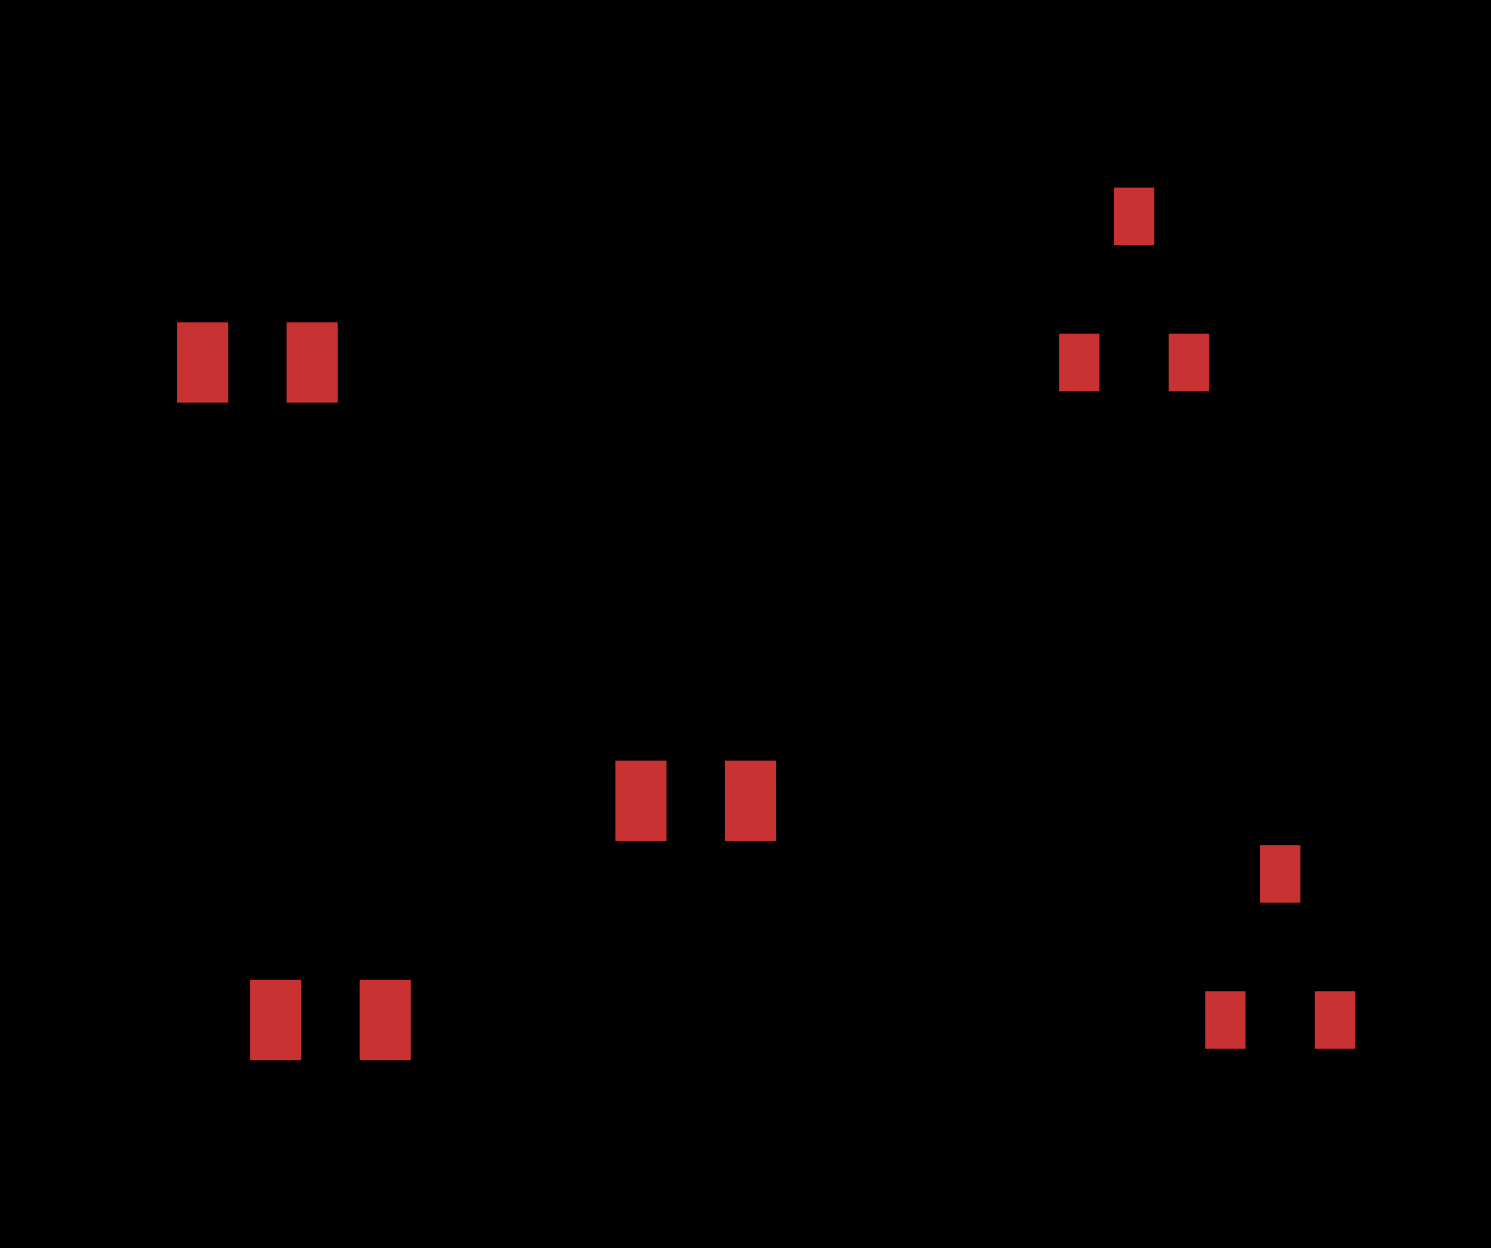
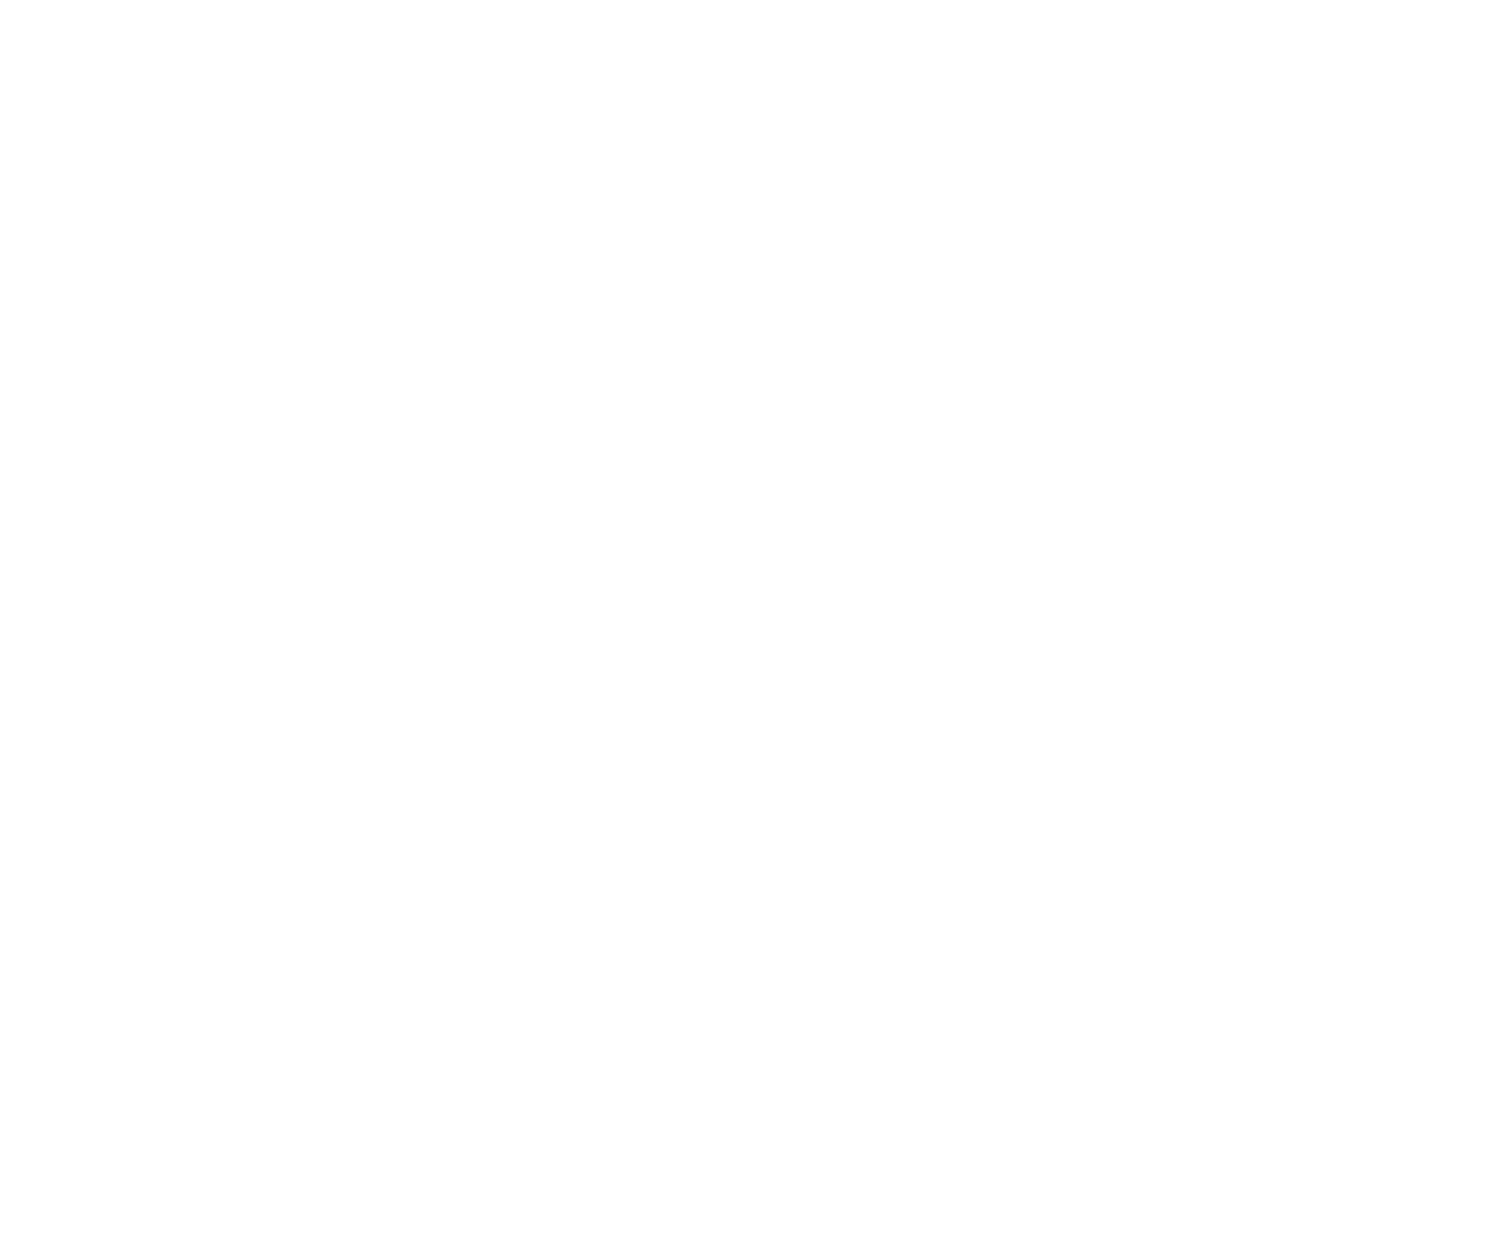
part: (1134, 289) -> none
part: (257, 362) -> none
part: (695, 800) -> none
part: (1280, 946) -> none
part: (330, 1020) -> none

